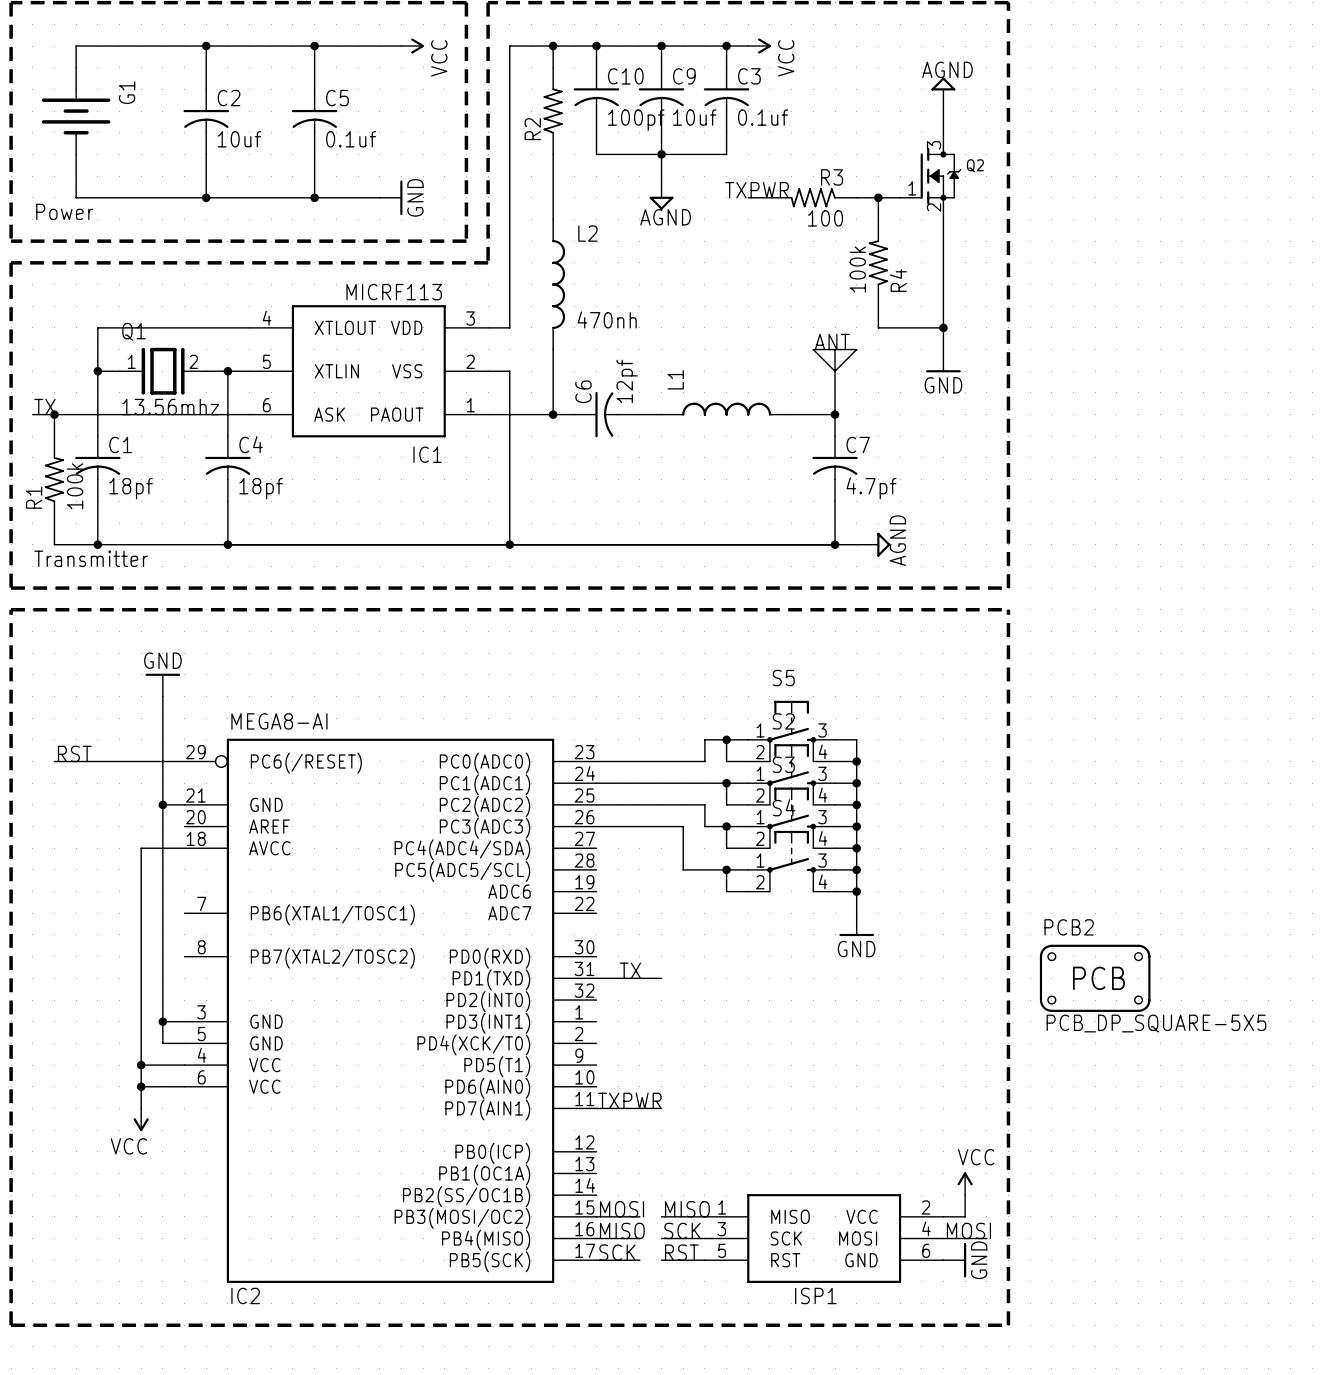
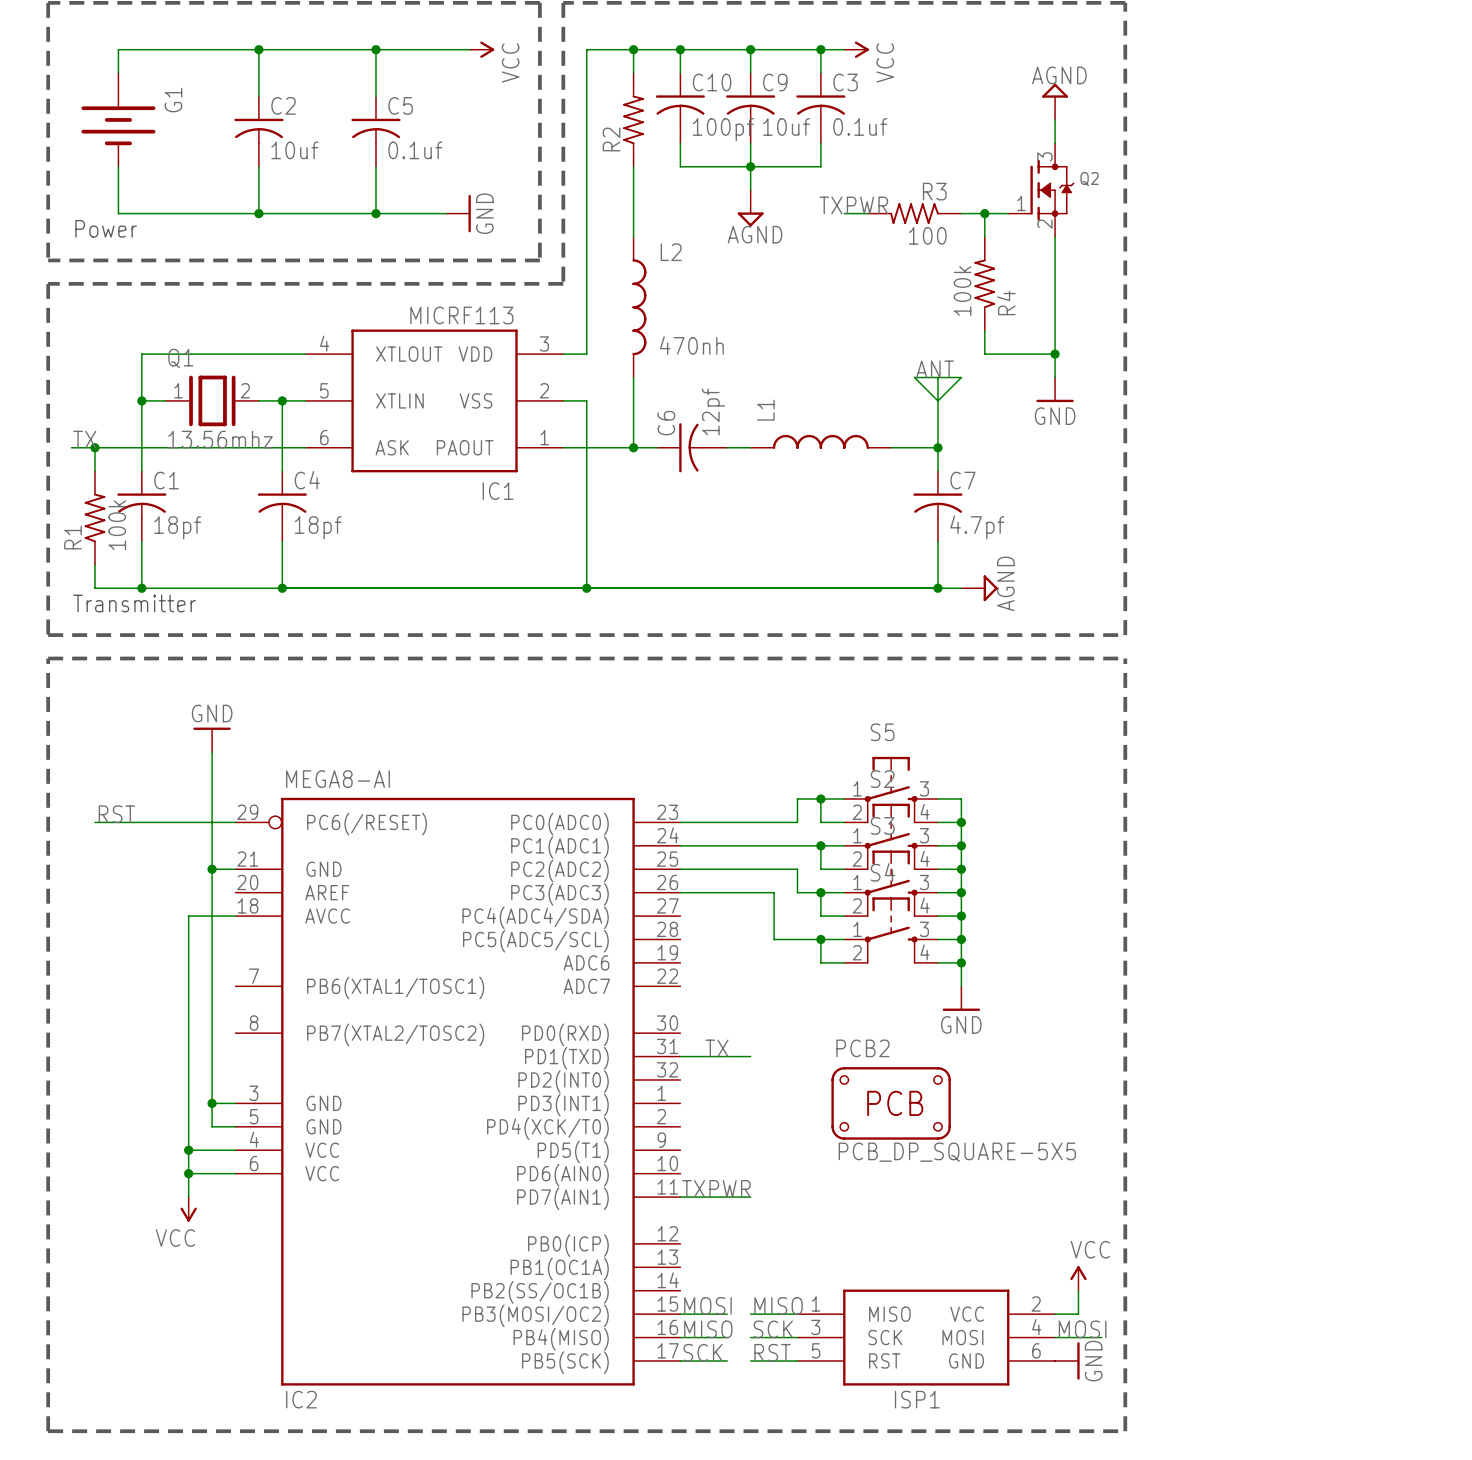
PCB2 position: (1095, 978) -> (891, 1103)

